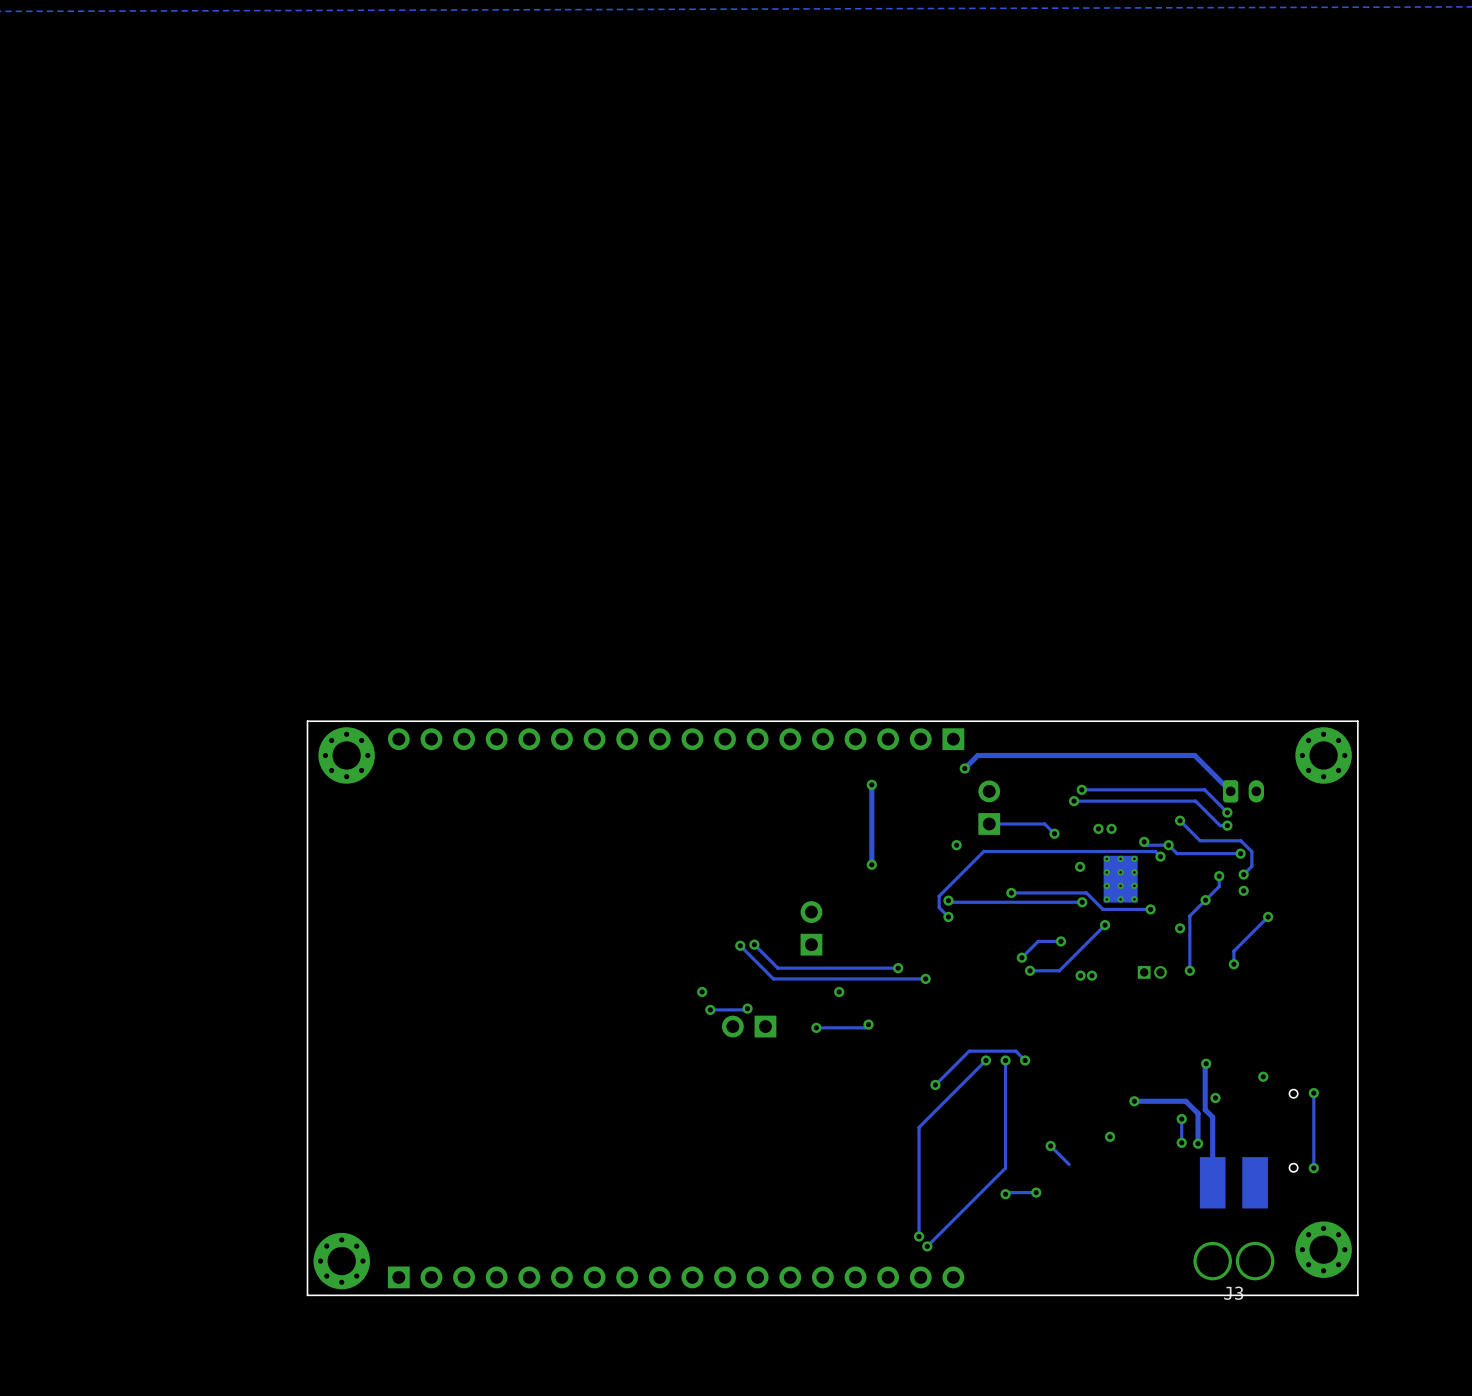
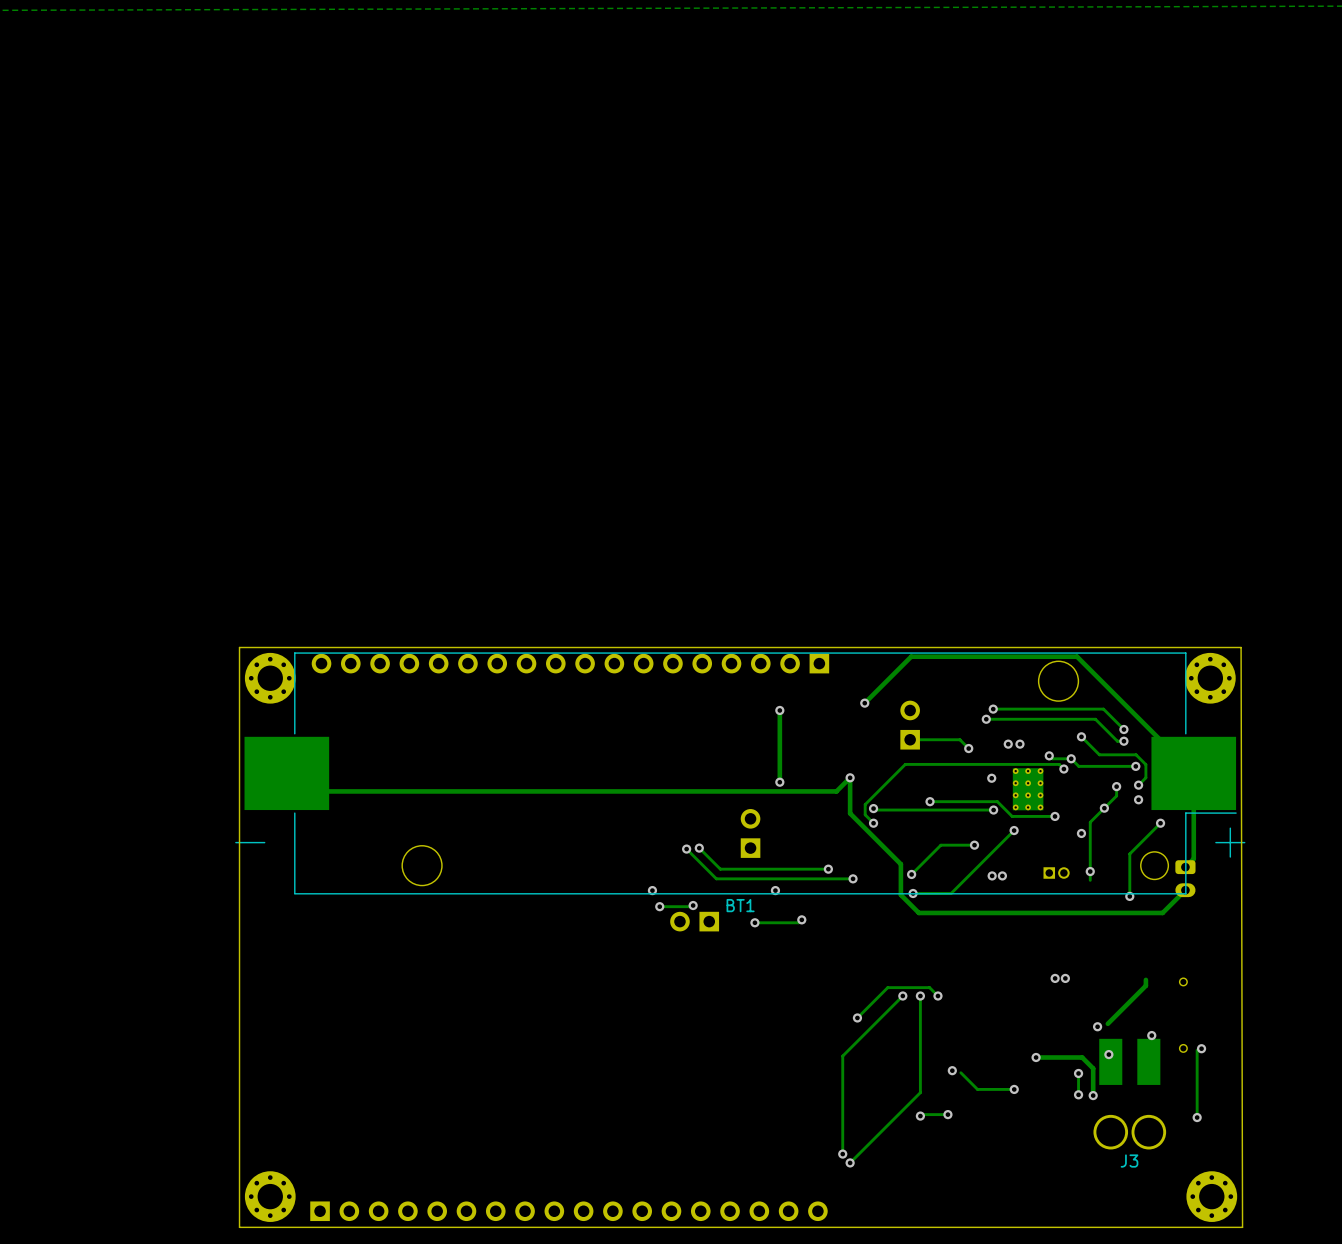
board edge: (1357, 721) (1357, 1295) (307, 1295) (307, 721) -> (1241, 647) (1242, 1227) (239, 1227) (239, 647) (298, 647)
part position: (676, 739) -> (570, 663)
part position: (346, 755) -> (270, 678)
track: (964, 768) (977, 755) (1194, 755) (1230, 791) -> none
via position: (964, 768) -> (864, 703)
track: none -> (864, 703) (911, 656) (1077, 656) (1193, 773) (1193, 858) (1185, 867)
track: (871, 784) (871, 864) -> (779, 710) (779, 782)
via position: (871, 784) -> (779, 710)
part rotation: 0° (1243, 791) -> 90° clockwise (1185, 878)
part position: (1243, 791) -> (1185, 878)
via: (956, 845) -> none
track: none -> (286, 773) (304, 791) (836, 791) (850, 777) (850, 813) (900, 864) (900, 894) (918, 912) (1162, 912) (1185, 890)
BT1: none -> (740, 773)
via: (871, 864) -> none
via: none -> (850, 777)
via: none -> (779, 782)
track: (1038, 941) (1021, 957) -> (954, 845) (940, 845) (911, 874)
via: (1021, 957) -> none
track: none -> (1129, 865) (1129, 896)
via position: (1233, 964) -> (1129, 896)
via: (1030, 970) -> none
track: (1059, 970) (1030, 970) -> (973, 871) (951, 893) (913, 893)
track: none -> (1090, 871) (1090, 880)
via: none -> (911, 874)
via: none -> (913, 893)
track: (985, 1060) (919, 1127) (919, 1236) -> (902, 996) (842, 1056) (842, 1154)
via: (985, 1060) -> none
track: (1005, 1060) (1005, 1168) (927, 1246) -> (920, 996) (920, 1092) (850, 1162)
via: (1005, 1060) -> none
track: (1025, 1060) (1015, 1051) (969, 1051) (935, 1084) -> (937, 996) (929, 987) (887, 987) (857, 1017)
via: (1025, 1060) -> none
track: (1206, 1063) (1205, 1109) (1212, 1117) (1212, 1182) -> none
via: (1206, 1063) -> none
via: (1263, 1076) -> none
via: (935, 1084) -> none
via: none -> (1055, 978)
via: none -> (1065, 978)
track: none -> (1145, 979) (1145, 985) (1107, 1023)
track: (1313, 1093) (1313, 1168) -> (1197, 1050) (1197, 1117)
via: (1313, 1093) -> none
via: (1215, 1097) -> none
track: (1134, 1101) (1185, 1101) (1198, 1113) (1198, 1143) -> (1036, 1057) (1082, 1057) (1093, 1068) (1093, 1095)
via: (1134, 1101) -> none
via: none -> (902, 996)
via: none -> (920, 996)
via: none -> (937, 996)
track: (1181, 1119) (1181, 1142) -> (1078, 1073) (1078, 1094)
via: (1181, 1119) -> none
via: none -> (857, 1017)
via: (1110, 1136) -> none
via: (1181, 1142) -> none
track: (1050, 1145) (1069, 1164) -> none
via: (1050, 1145) -> none
via: none -> (1151, 1035)
via: none -> (1108, 1054)
via: none -> (1036, 1057)
track: (1036, 1192) (1007, 1192) (1005, 1194) -> (947, 1114) (920, 1116)
via: (1005, 1194) -> none
track: none -> (960, 1072) (977, 1089) (1014, 1089)
via: none -> (1078, 1073)
via: none -> (1014, 1089)
via: none -> (1078, 1094)
via: none -> (1093, 1095)
via: (919, 1236) -> none
via: none -> (947, 1114)
via: none -> (920, 1116)
via: none -> (1197, 1117)
via: (927, 1246) -> none
part position: (1323, 1249) -> (1211, 1196)
part position: (341, 1261) -> (270, 1196)
part position: (676, 1277) -> (568, 1211)
via: none -> (842, 1154)
via: none -> (850, 1162)

